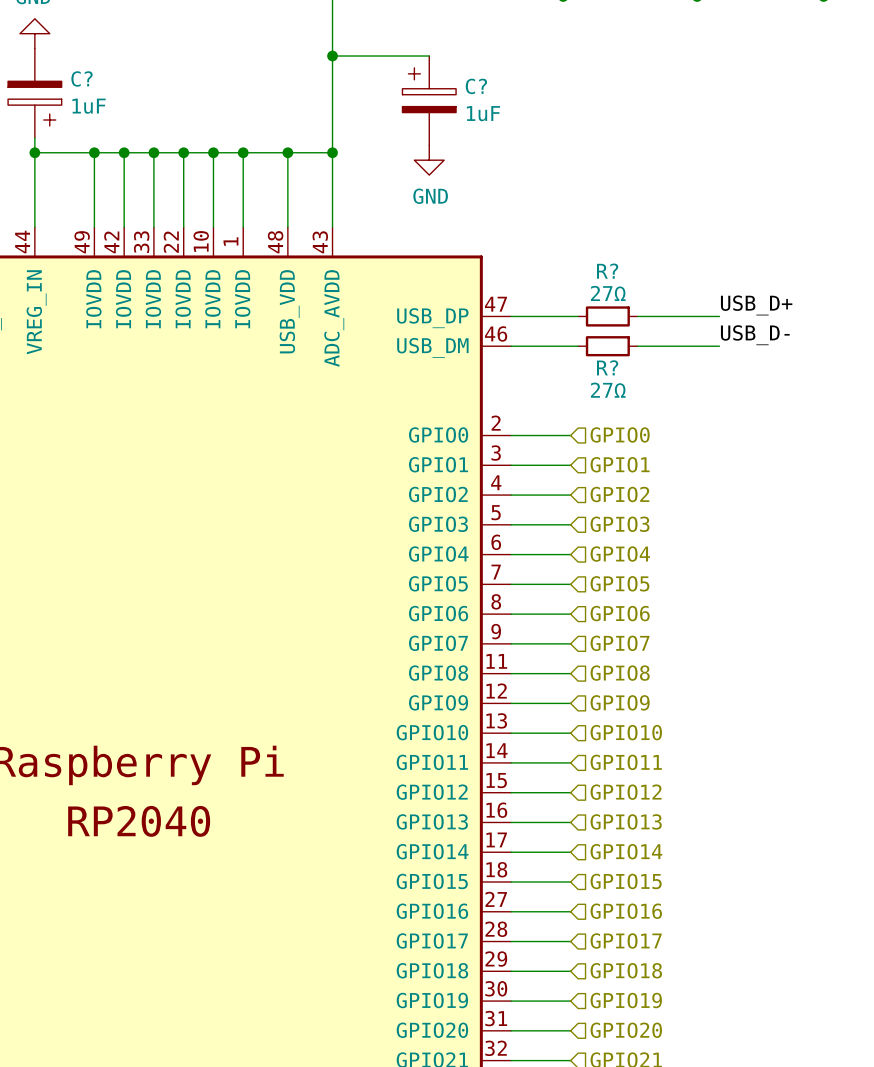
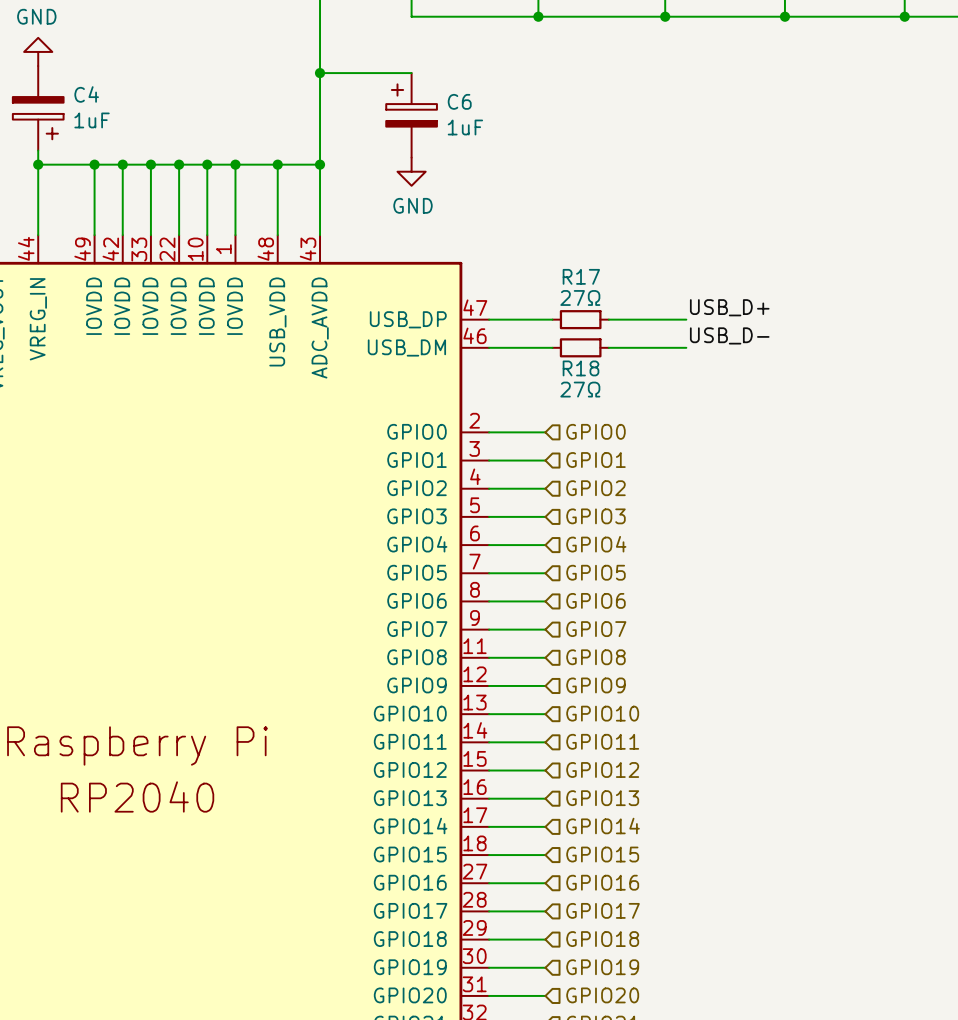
C? name: C? (82, 78) -> C4 (86, 94)
C? name: C? (476, 86) -> C6 (459, 101)
R? name: R? (607, 271) -> R17 (581, 276)
R? name: R? (607, 367) -> R18 (581, 368)

